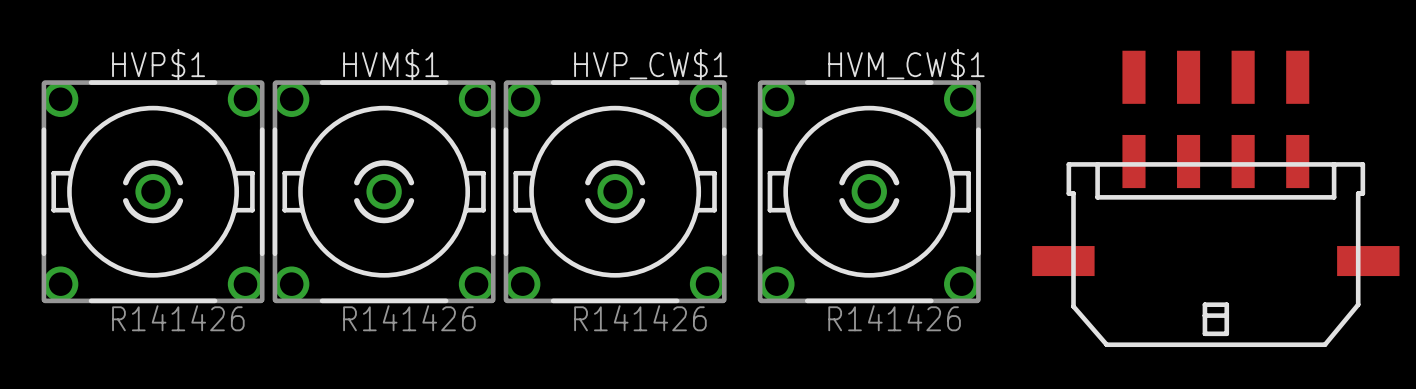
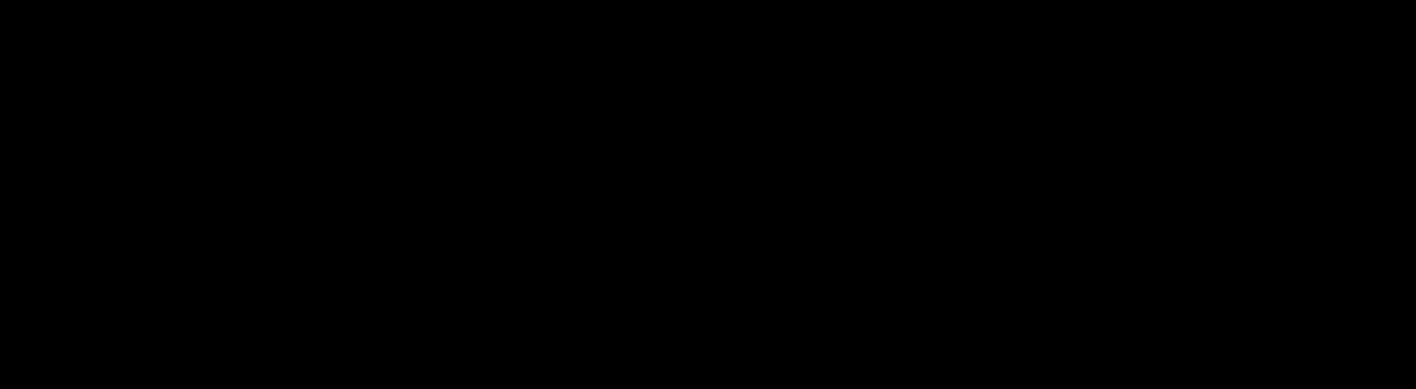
HVP$1: R141426 (153, 191) -> none
HVM$1: R141426 (384, 191) -> none
HVP_CW$1: R141426 (615, 191) -> none
HVM_CW$1: R141426 (869, 191) -> none
part: (1215, 198) -> none

